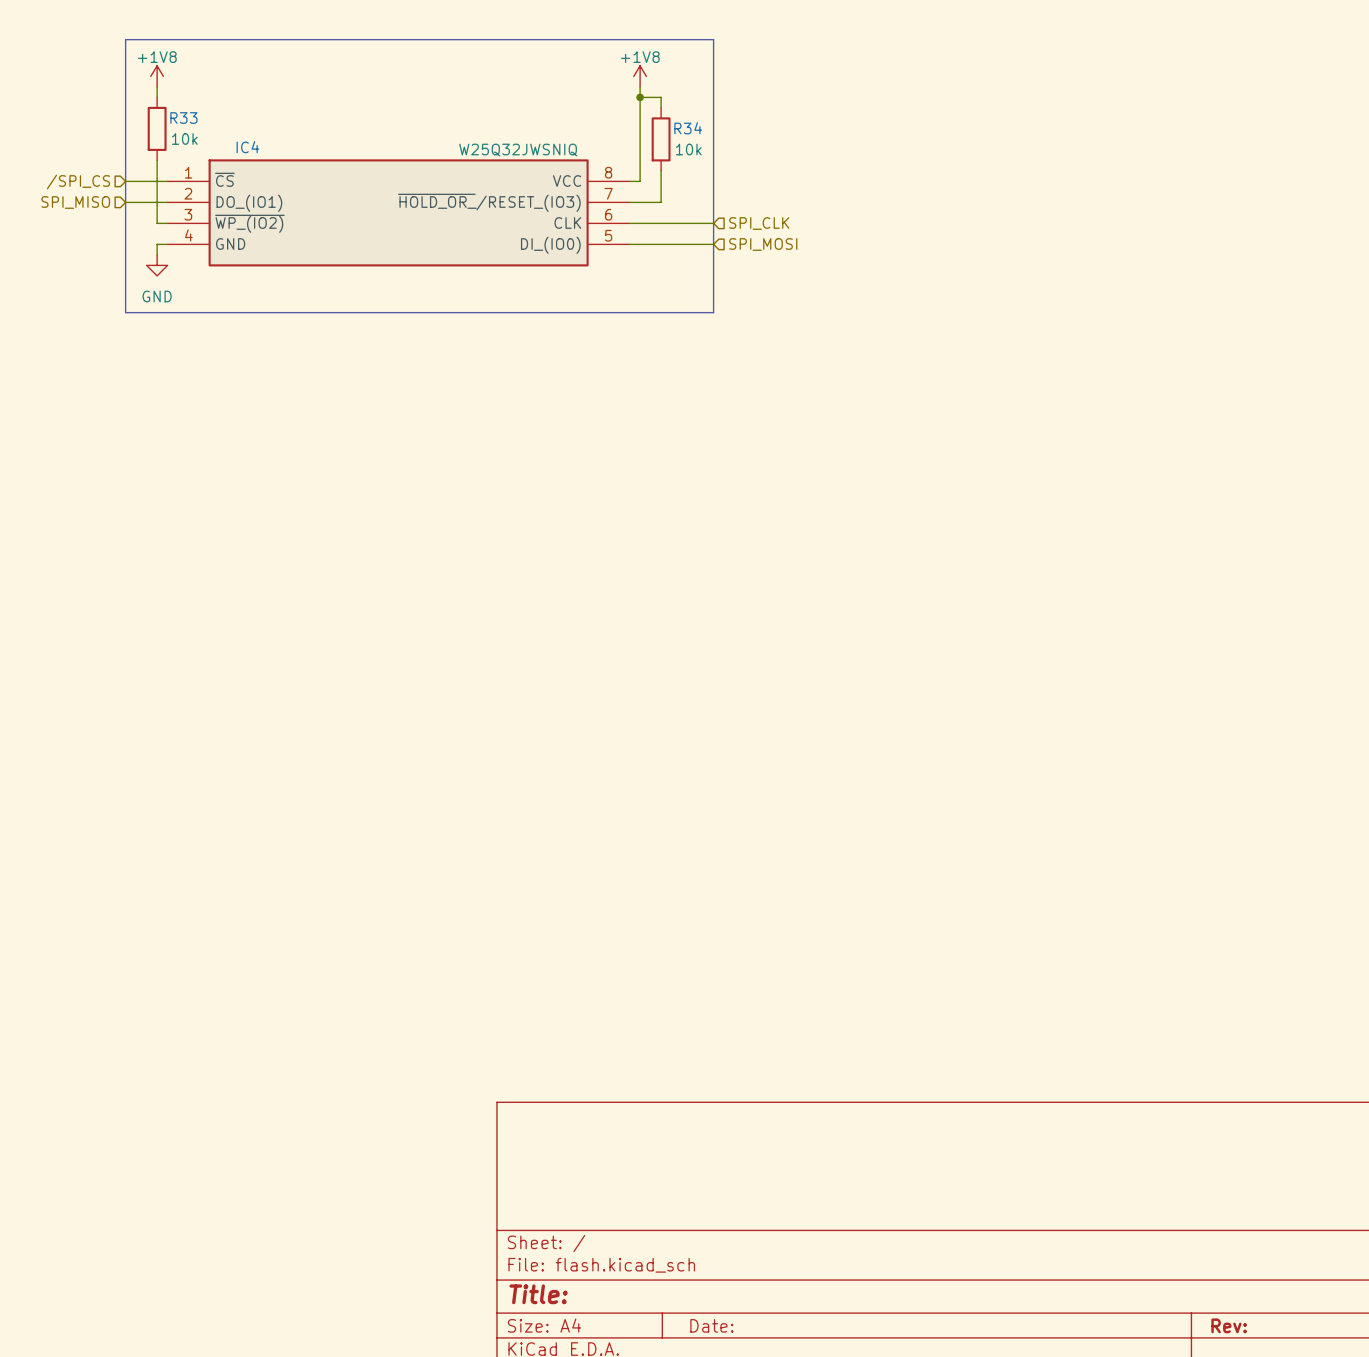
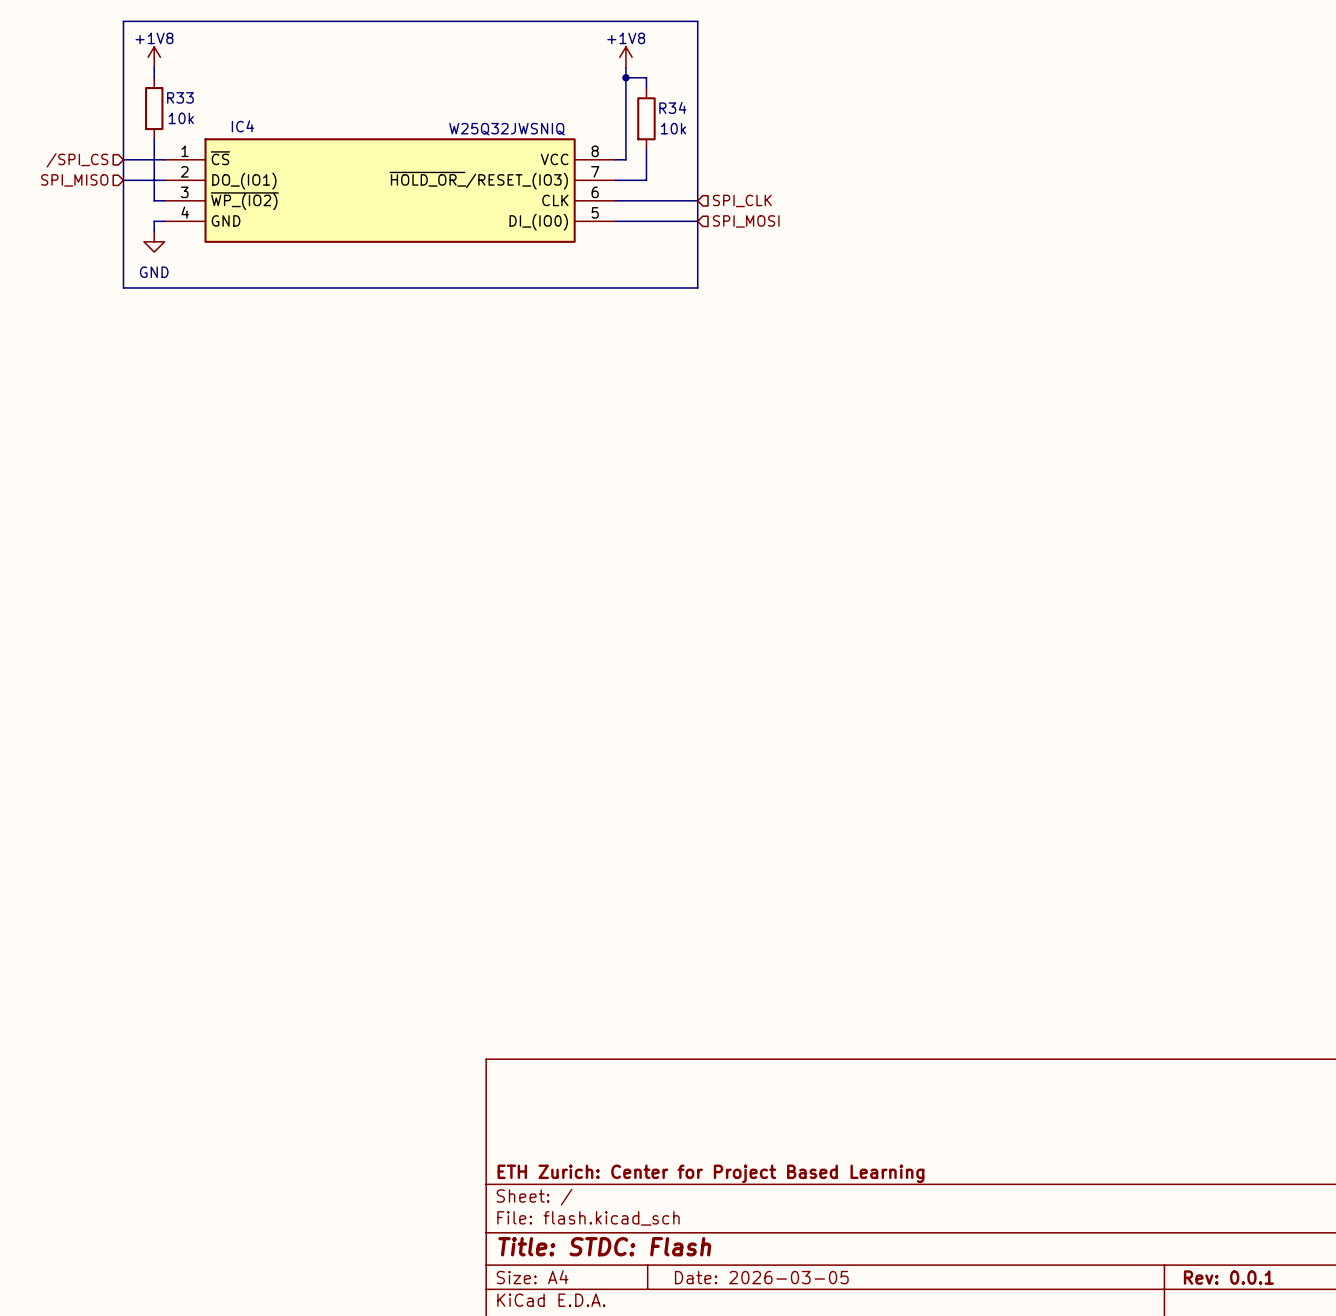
title block: none -> ETH Zurich: Center for Project Based Learning (710, 1173)
title block: Title: (538, 1294) -> Title: STDC: Flash (604, 1246)
title block: Date: (711, 1325) -> Date: 2026-03-05 (761, 1277)
title block: Rev: (1229, 1325) -> Rev: 0.0.1 (1228, 1277)

